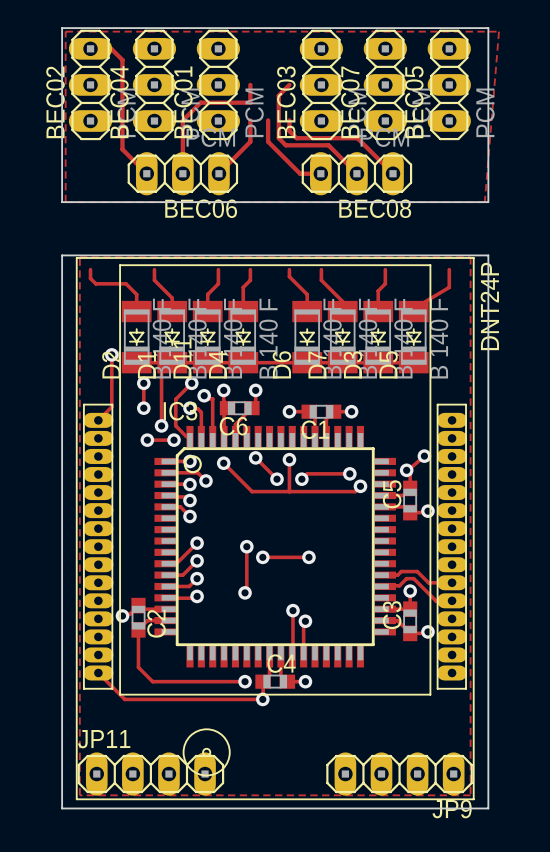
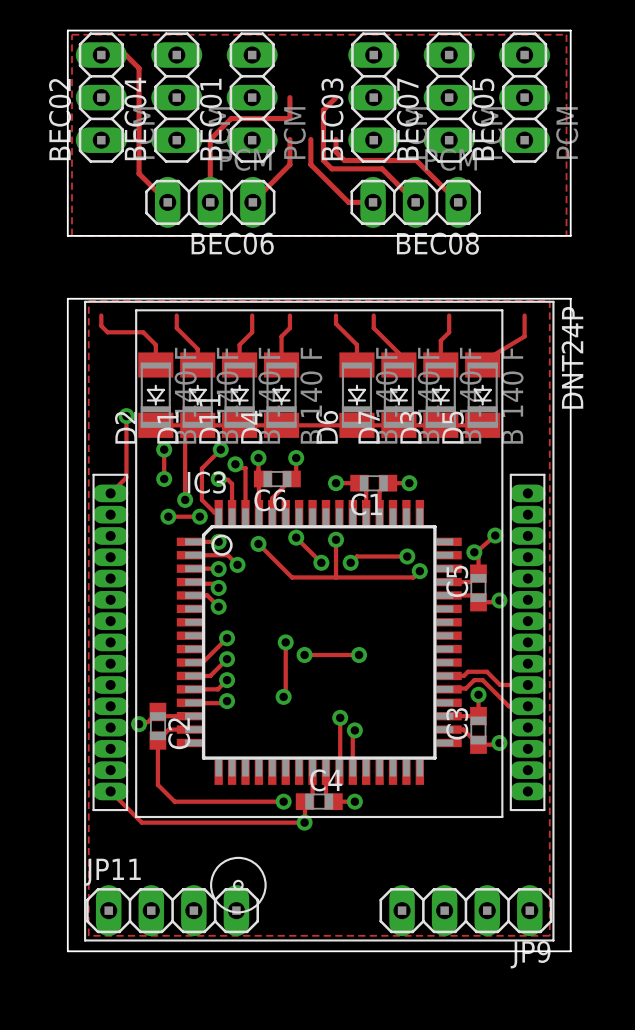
zone outline: (484, 31) (499, 31) (484, 202) -> (566, 34) (566, 235)

